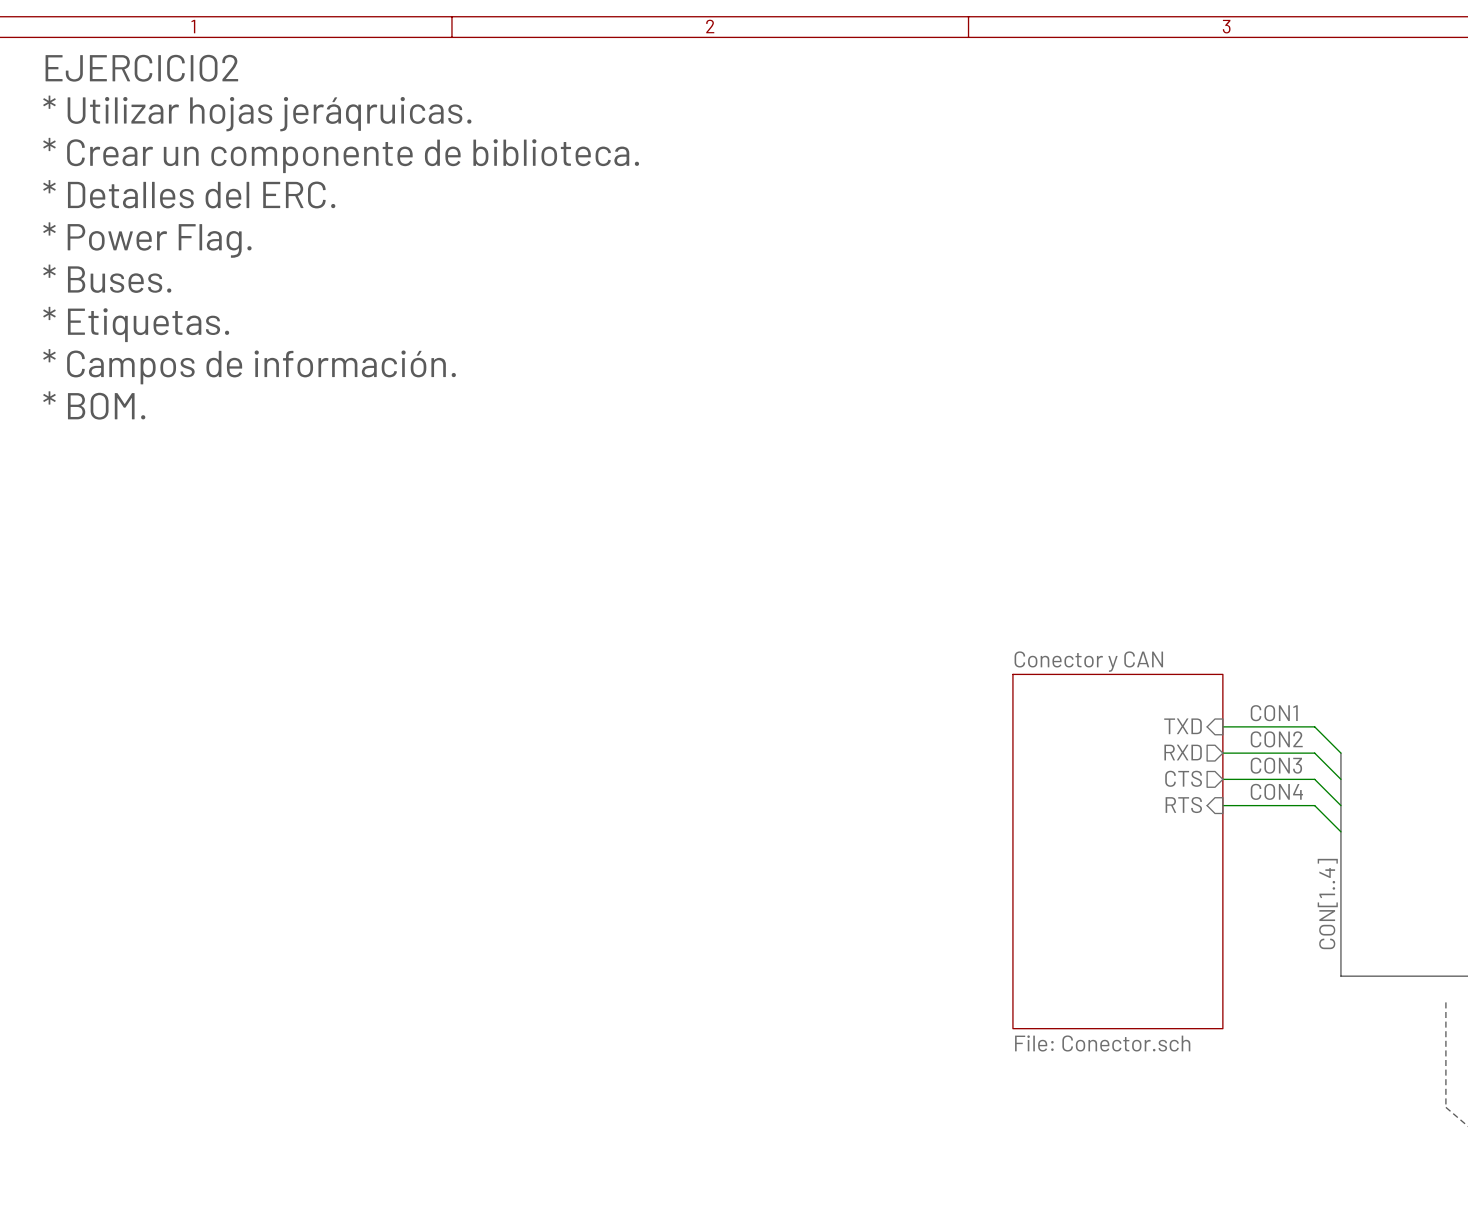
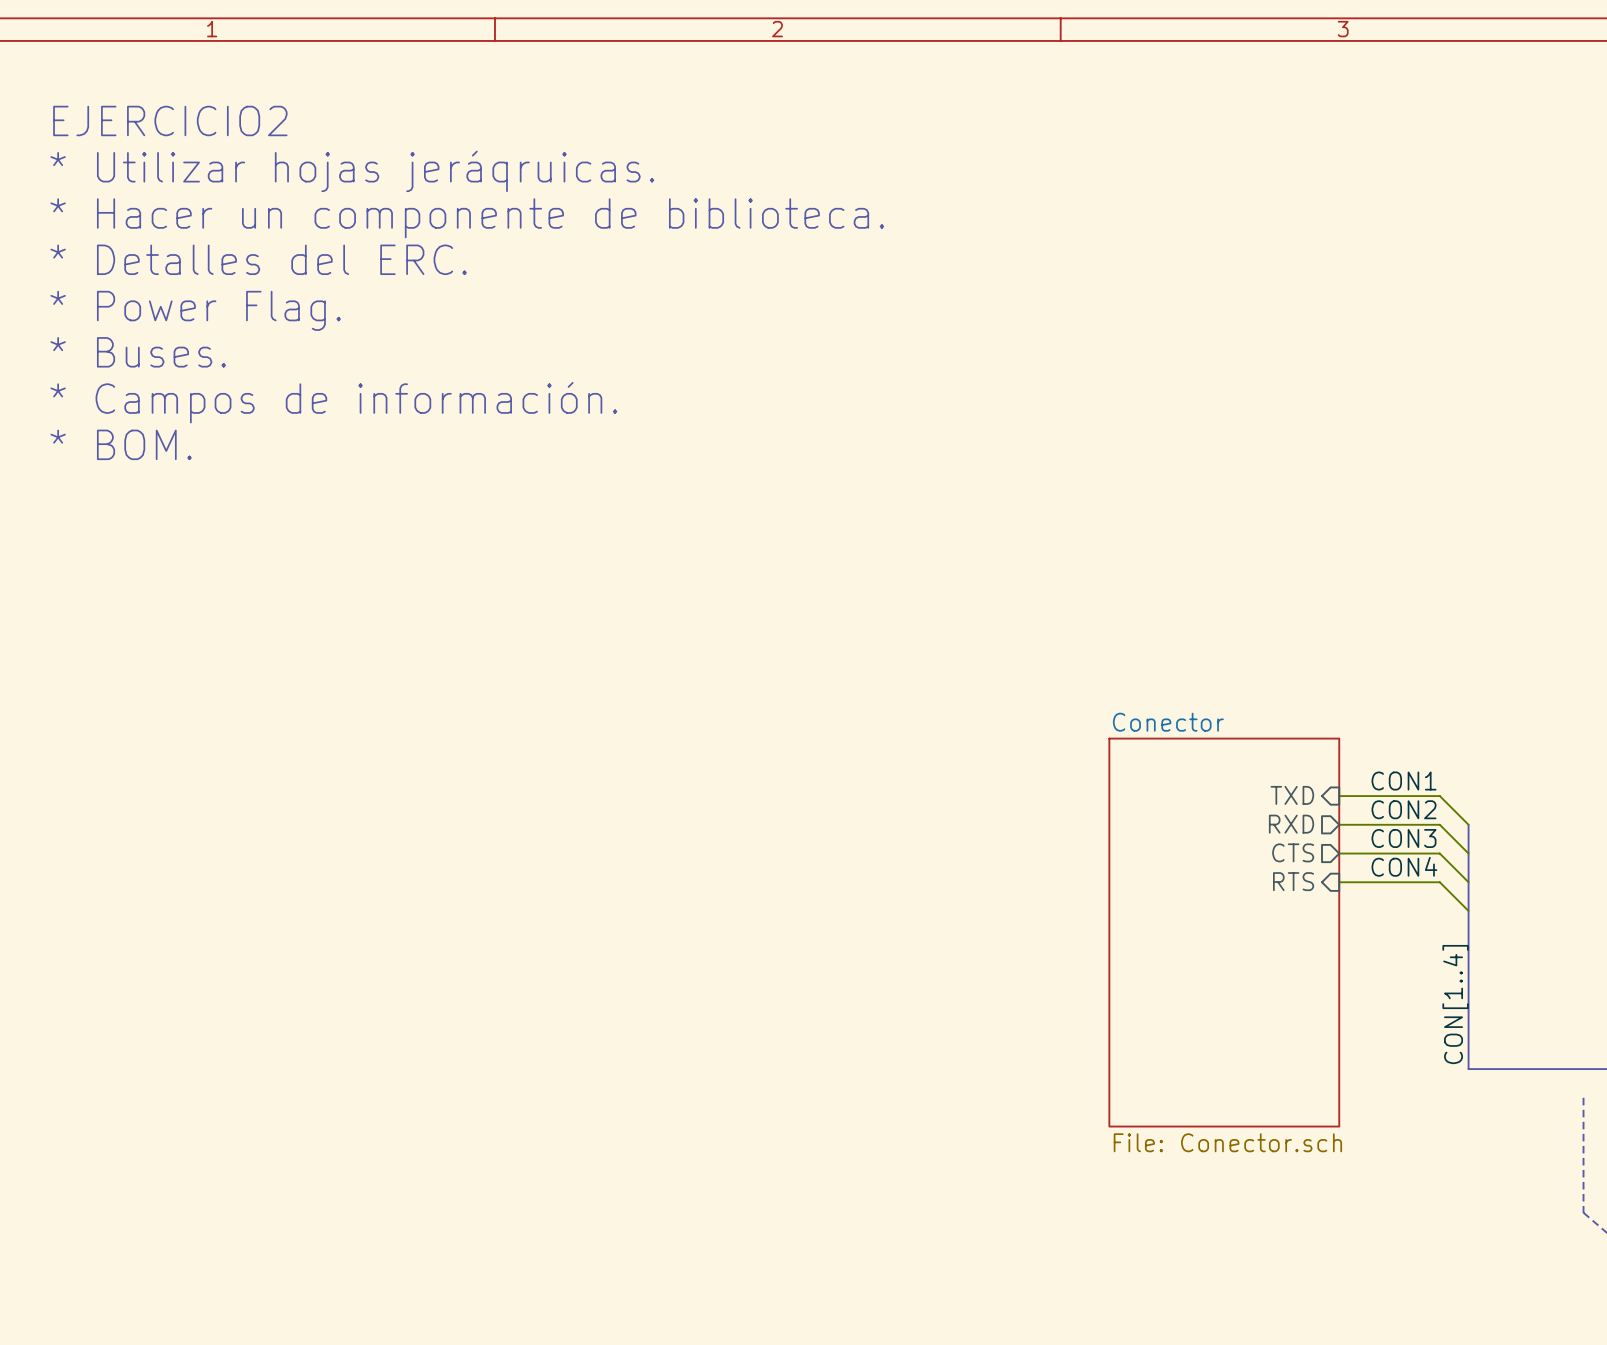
text: EJERCICIO2 (141, 68) -> none
text: * Utilizar hojas jeráqruicas. (257, 113) -> EJERCICIO2 (170, 120)
text: * Crear un componente de biblioteca. (341, 155) -> * Utilizar hojas jeráqruicas. (352, 171)
text: * Detalles del ERC. (189, 194) -> * Hacer un componente de biblioteca. (467, 218)
text: * Power Flag. (147, 240) -> * Detalles del ERC. (258, 259)
text: * Buses. (107, 278) -> * Power Flag. (195, 310)
text: * Etiquetas. (136, 324) -> * Buses. (138, 352)
sheet Conector y CAN name: Conector y CAN (1088, 661) -> Conector (1168, 722)

